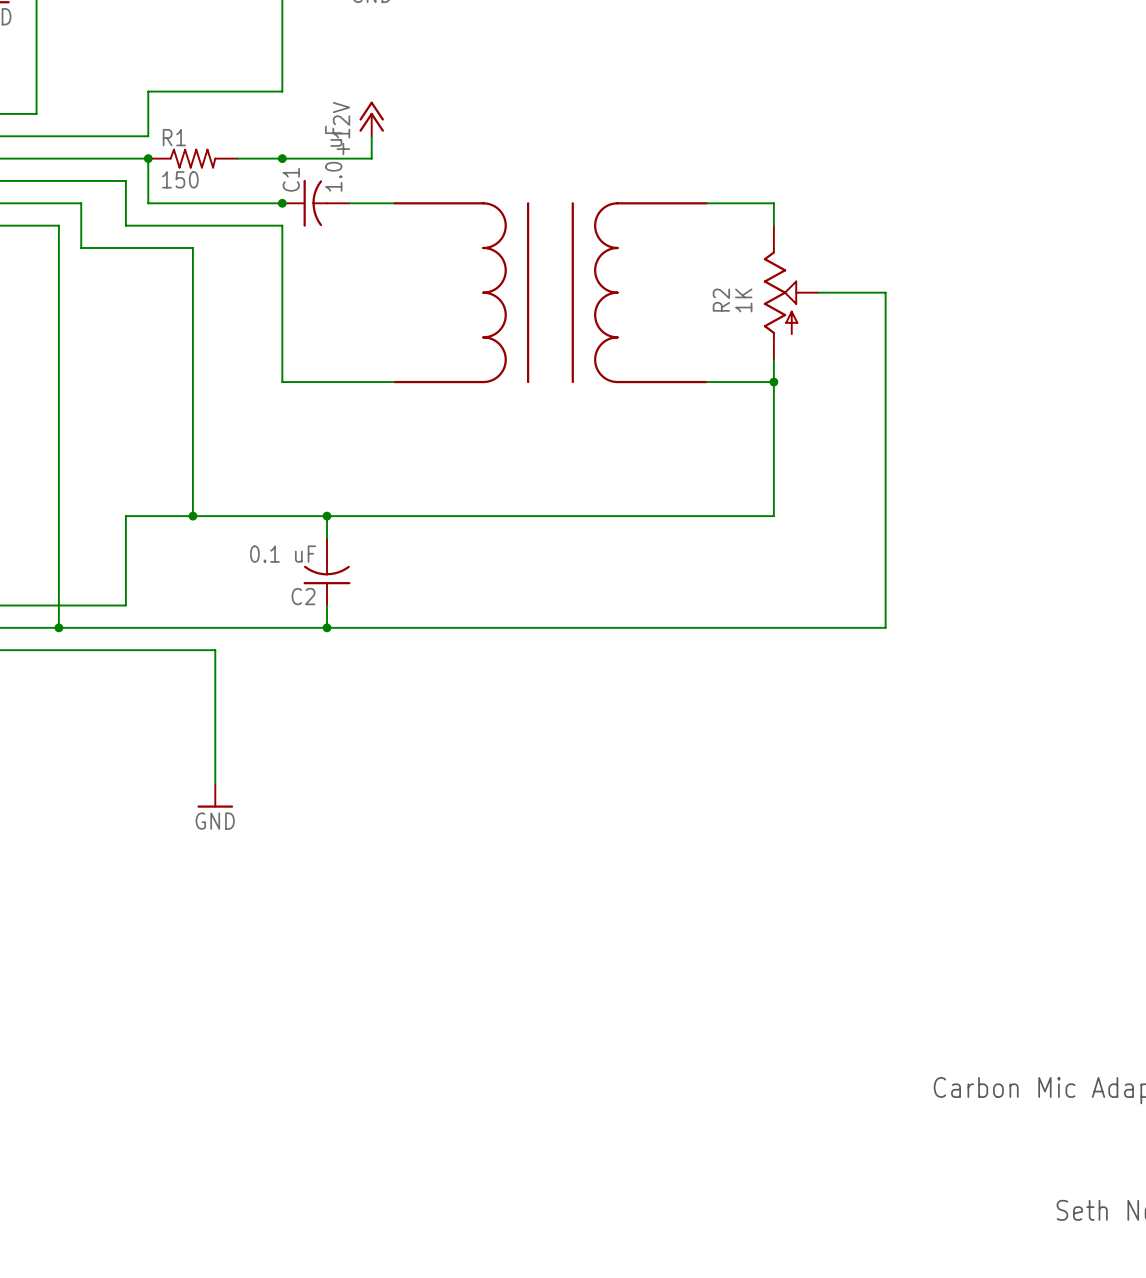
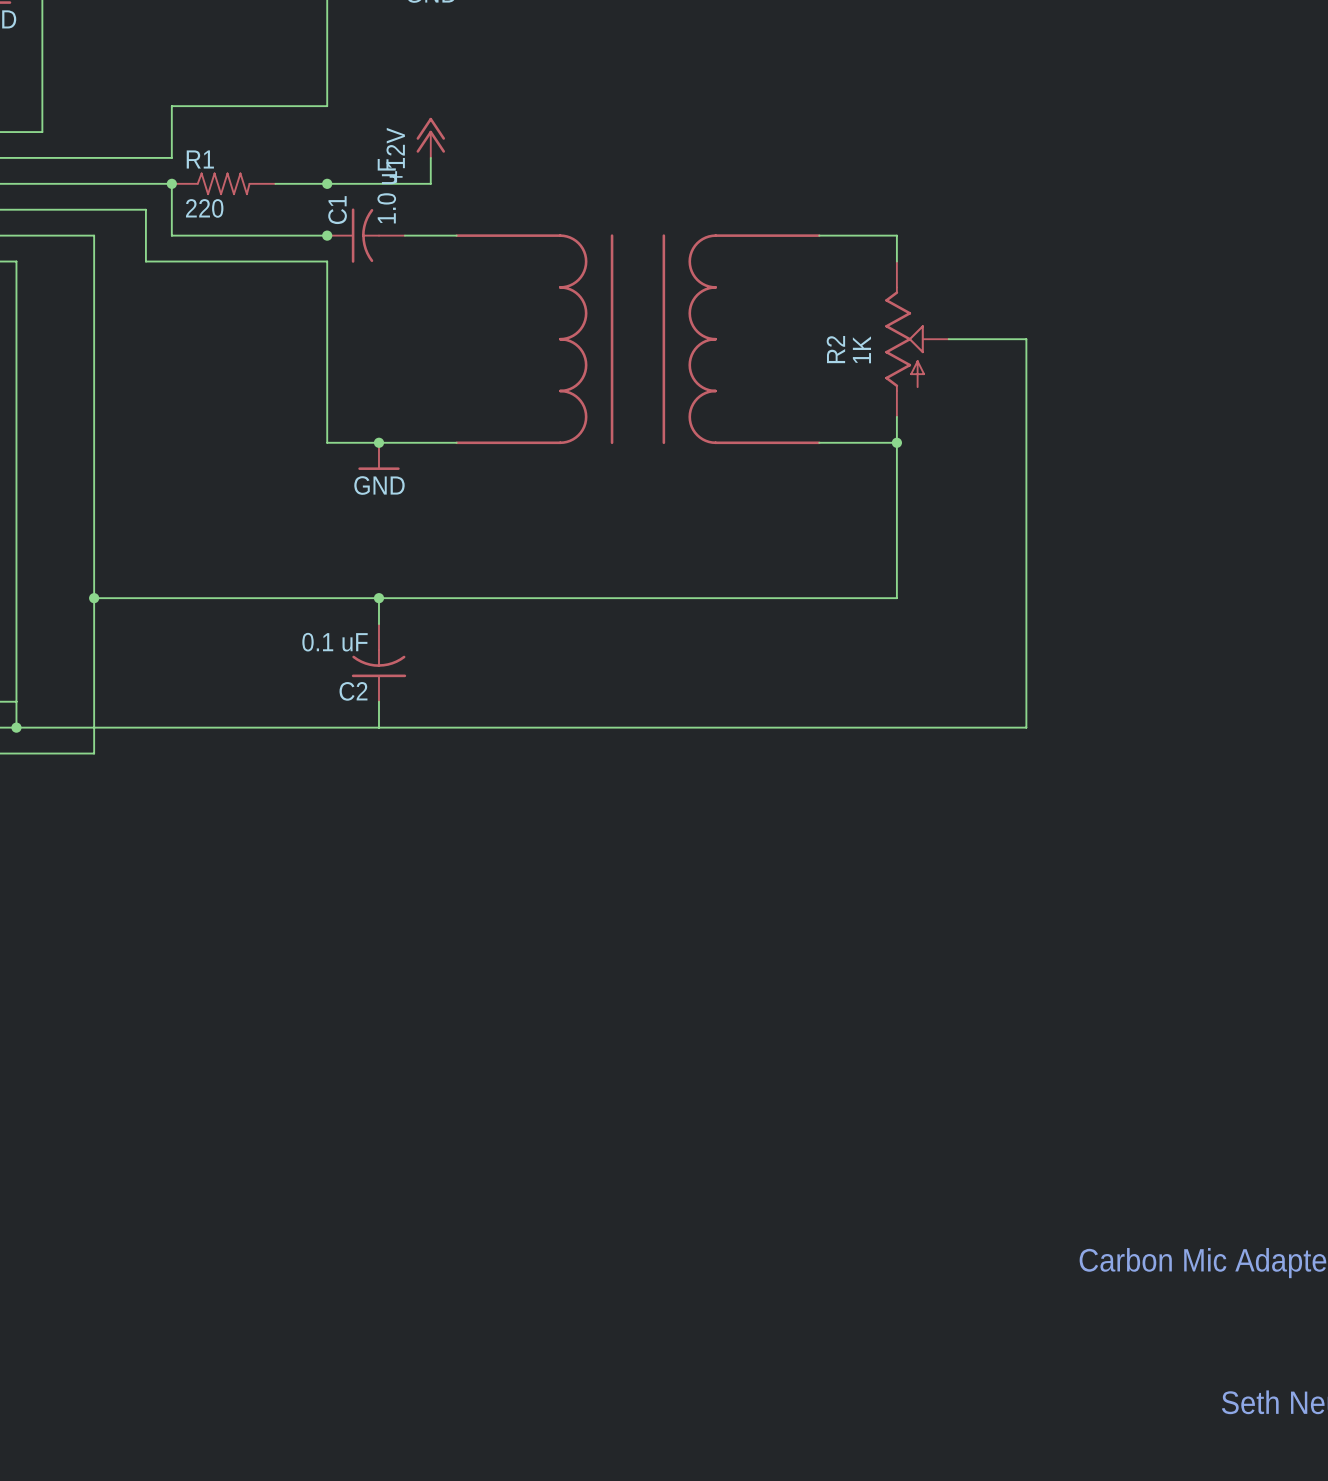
R1 value: 150 (180, 179) -> 220 (204, 208)
wire: (14, 225) (58, 225) (58, 627) -> (16, 261) (16, 727)
wire: (81, 247) (192, 247) (192, 516) -> (94, 287) (94, 753)
junction: none -> (379, 442)
power symbol: none -> GND (379, 456)
junction: none -> (94, 598)
wire: (125, 516) (125, 605) (14, 605) -> (145, 598) (94, 598)
junction: (192, 516) -> none
junction position: (58, 627) -> (16, 727)
junction: (327, 627) -> none
wire: (81, 650) (215, 650) (215, 784) -> none
power symbol: GND (215, 795) -> none

